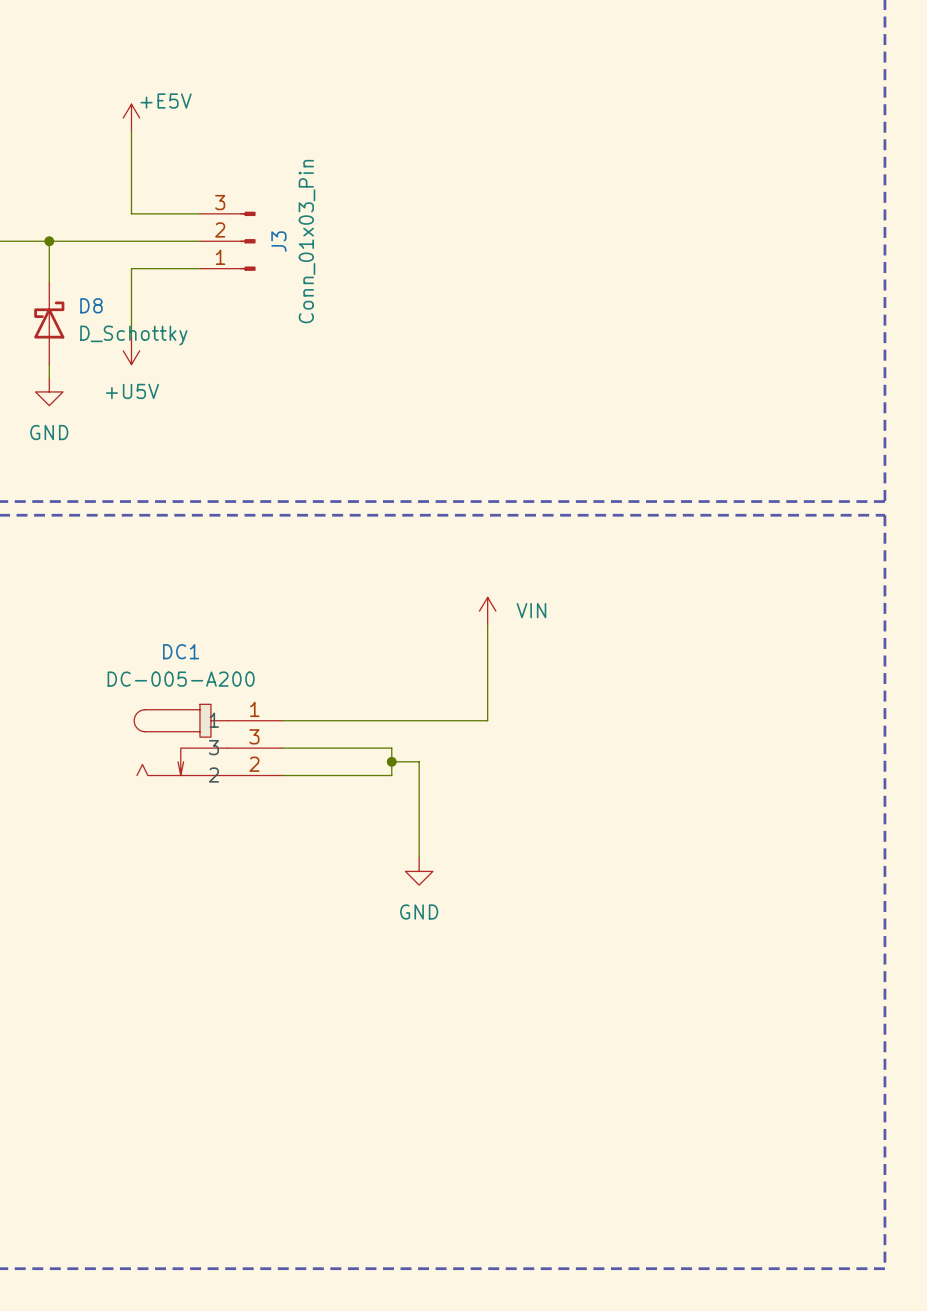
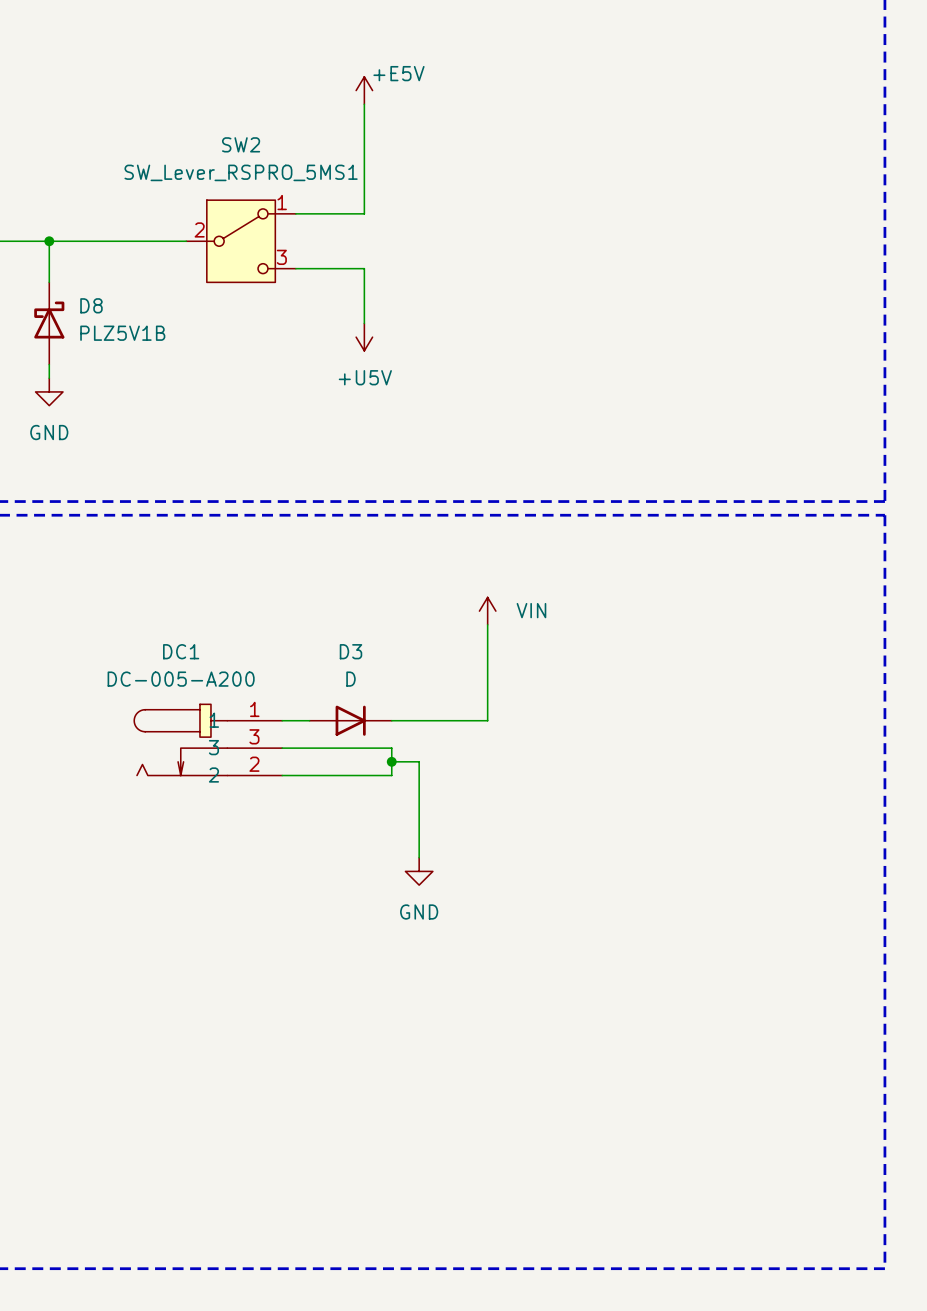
wire: none -> (364, 104) (364, 213) (295, 213)
power symbol position: +E5V (131, 117) -> +E5V (364, 90)
wire: (131, 131) (131, 213) (199, 213) -> none
J3: Conn_01x03_Pin (227, 241) -> none
SW2: none -> SW_Lever_RSPRO_5MS1 (241, 241)
wire: (199, 268) (131, 268) (131, 337) -> none
wire: none -> (295, 268) (364, 268) (364, 323)
D8 value: D_Schottky (133, 335) -> PLZ5V1B (122, 333)
power symbol position: +U5V (131, 350) -> +U5V (364, 337)
D3: none -> D (350, 720)

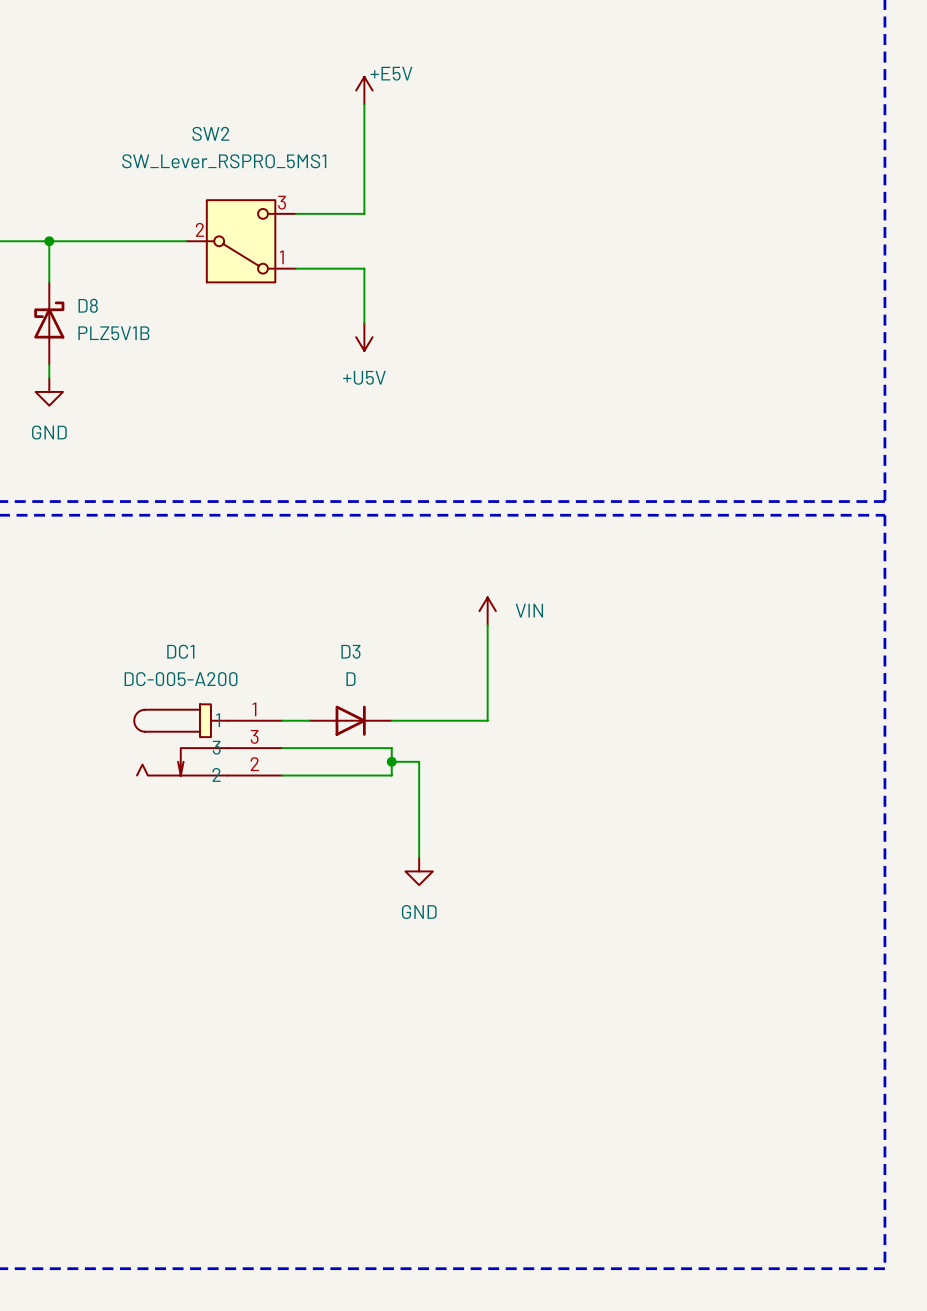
SW2 name position: SW2 (241, 144) -> SW2 (210, 133)
SW2 flip: as is (241, 241) -> up-down (241, 241)

